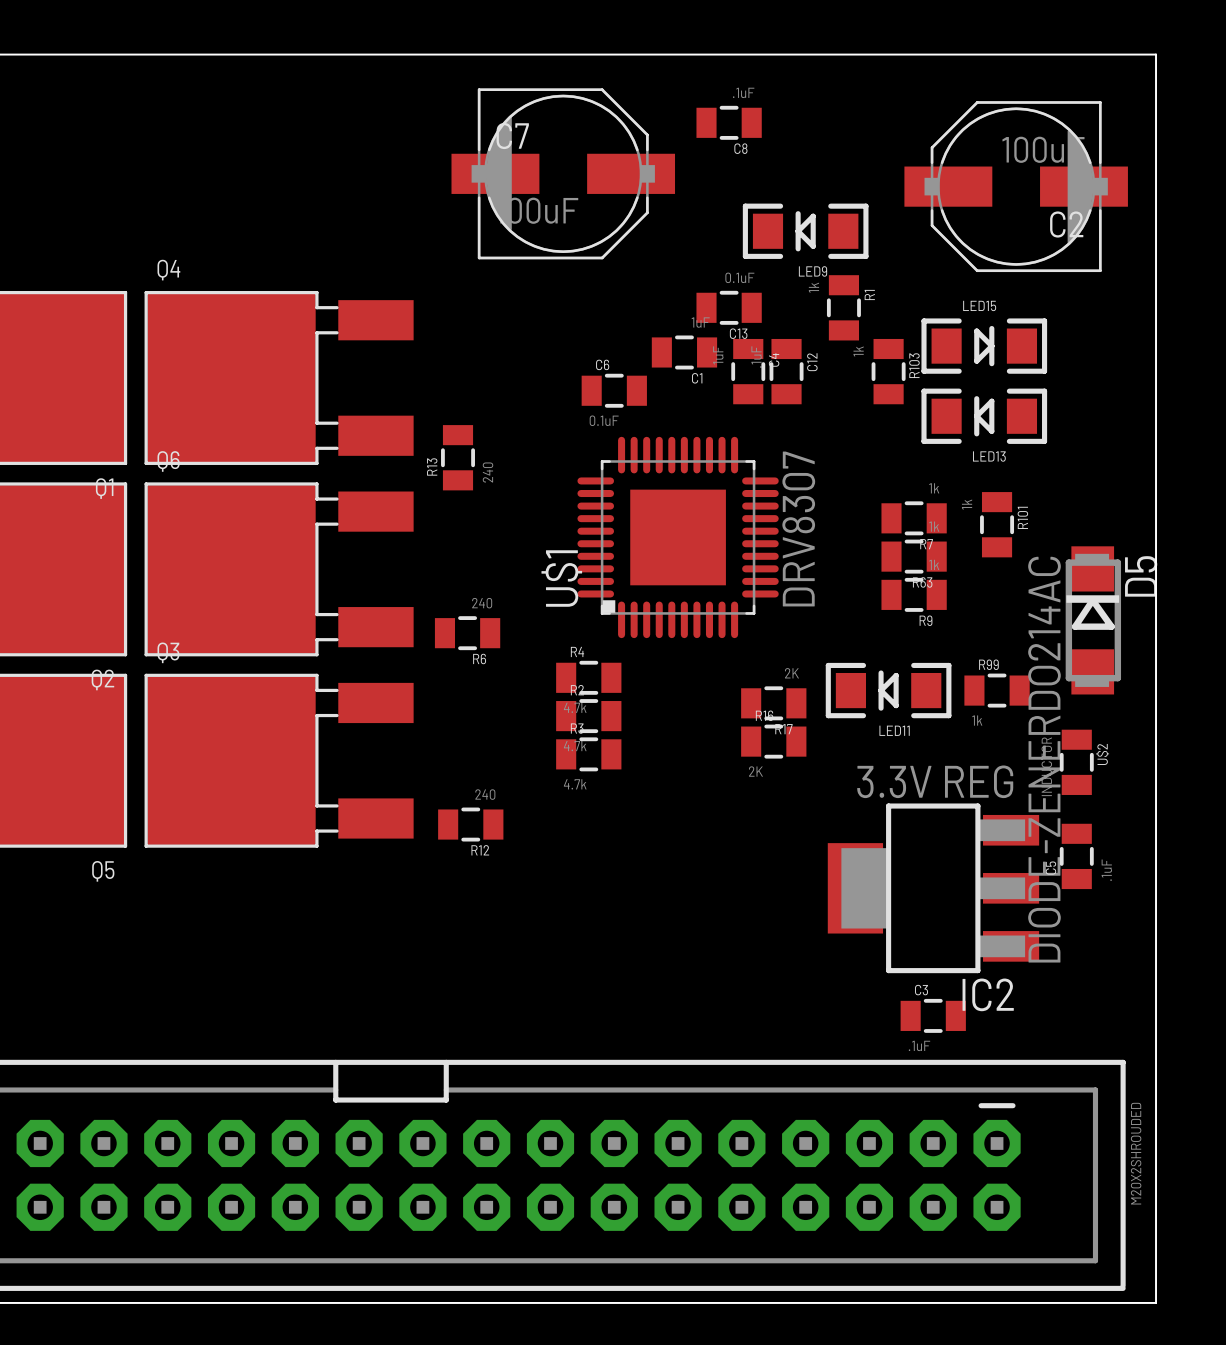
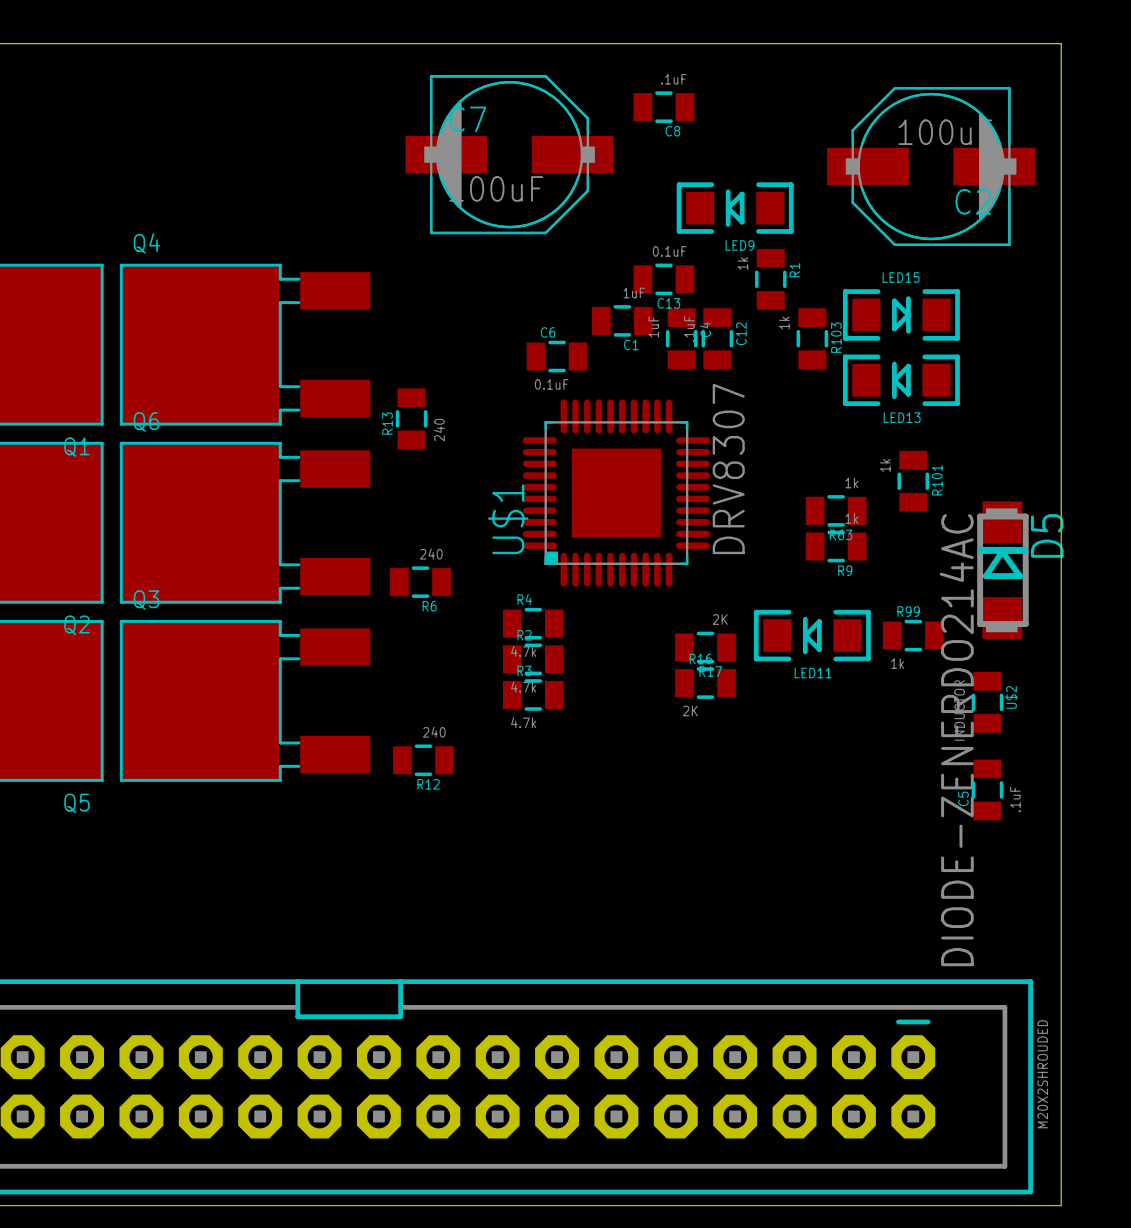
R7: 1k (914, 518) -> none
IC2: 3.3V REG (933, 888) -> none
C3: .1uF (933, 1015) -> none

